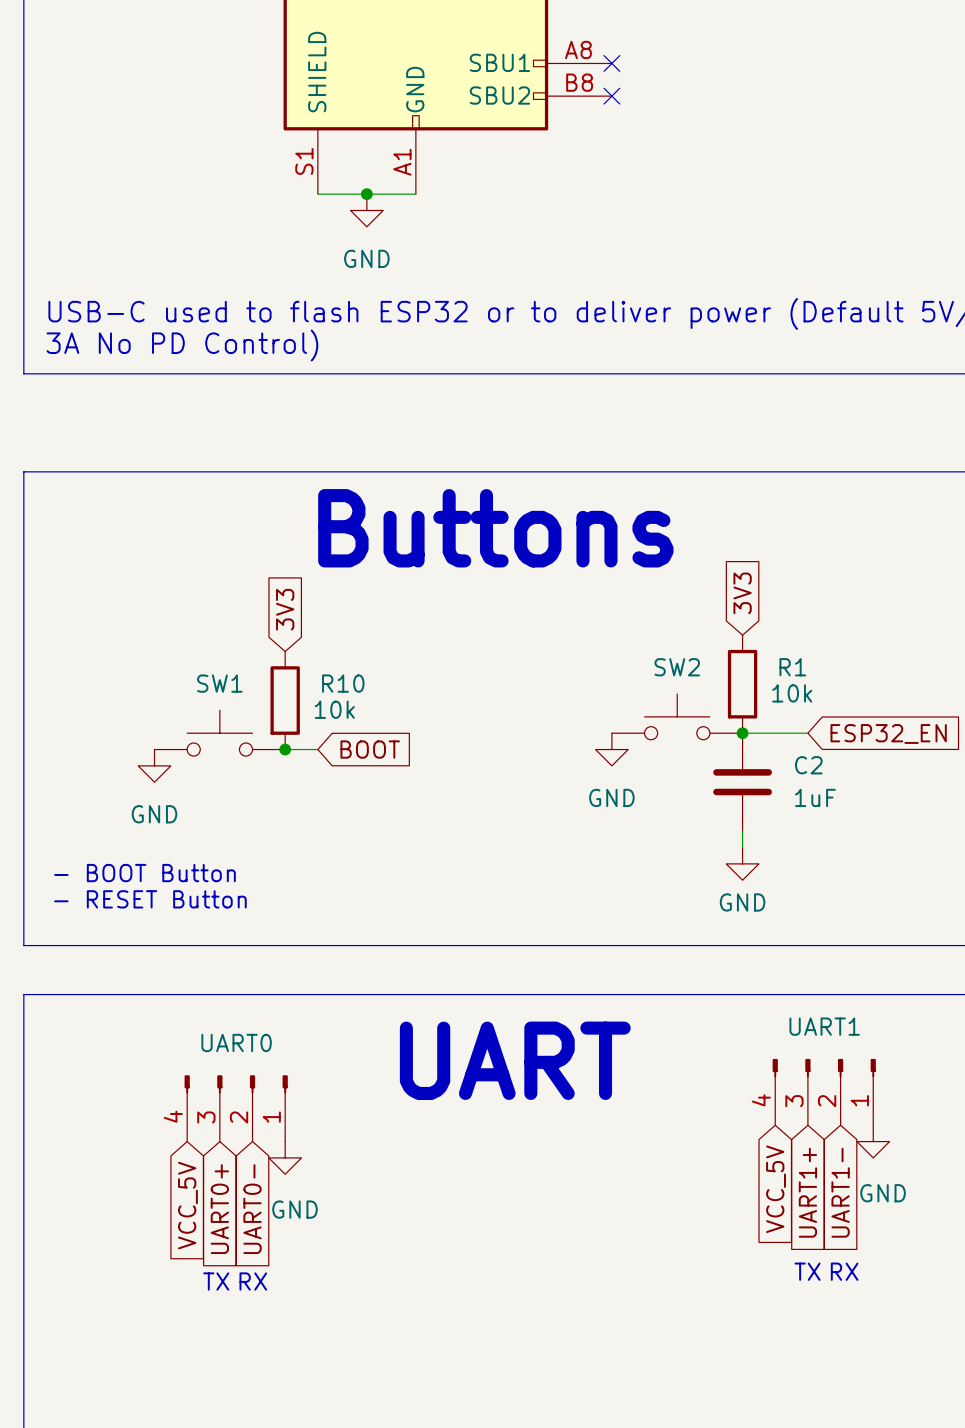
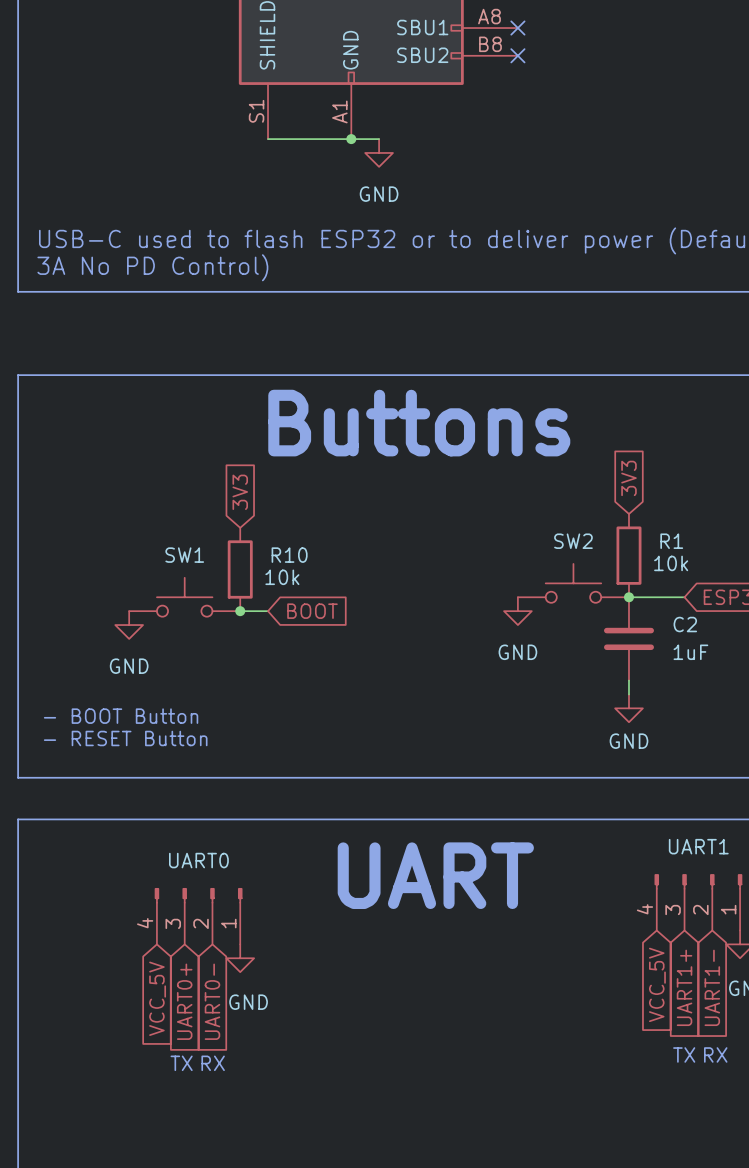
junction position: (366, 194) -> (351, 139)
wire: none -> (351, 139) (379, 139)
power symbol position: GND (366, 210) -> GND (379, 152)

